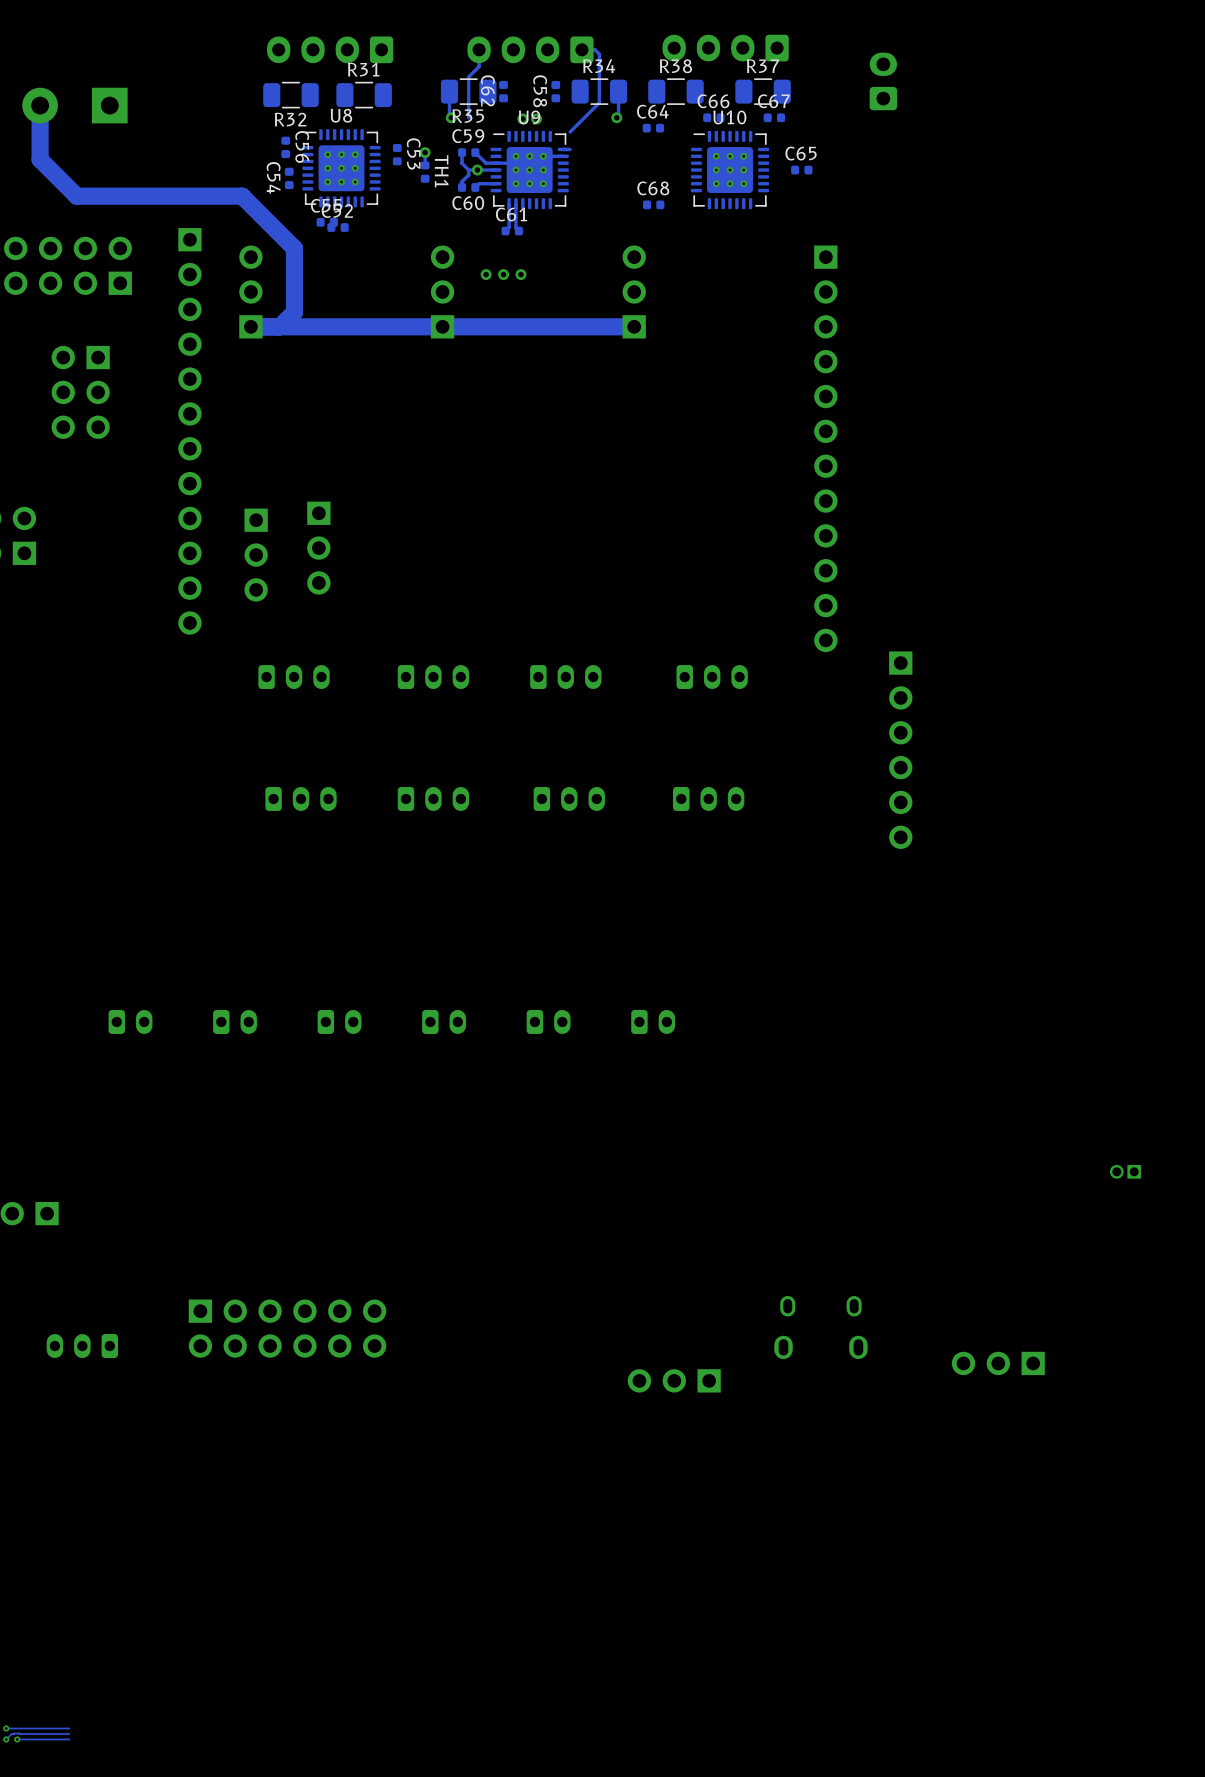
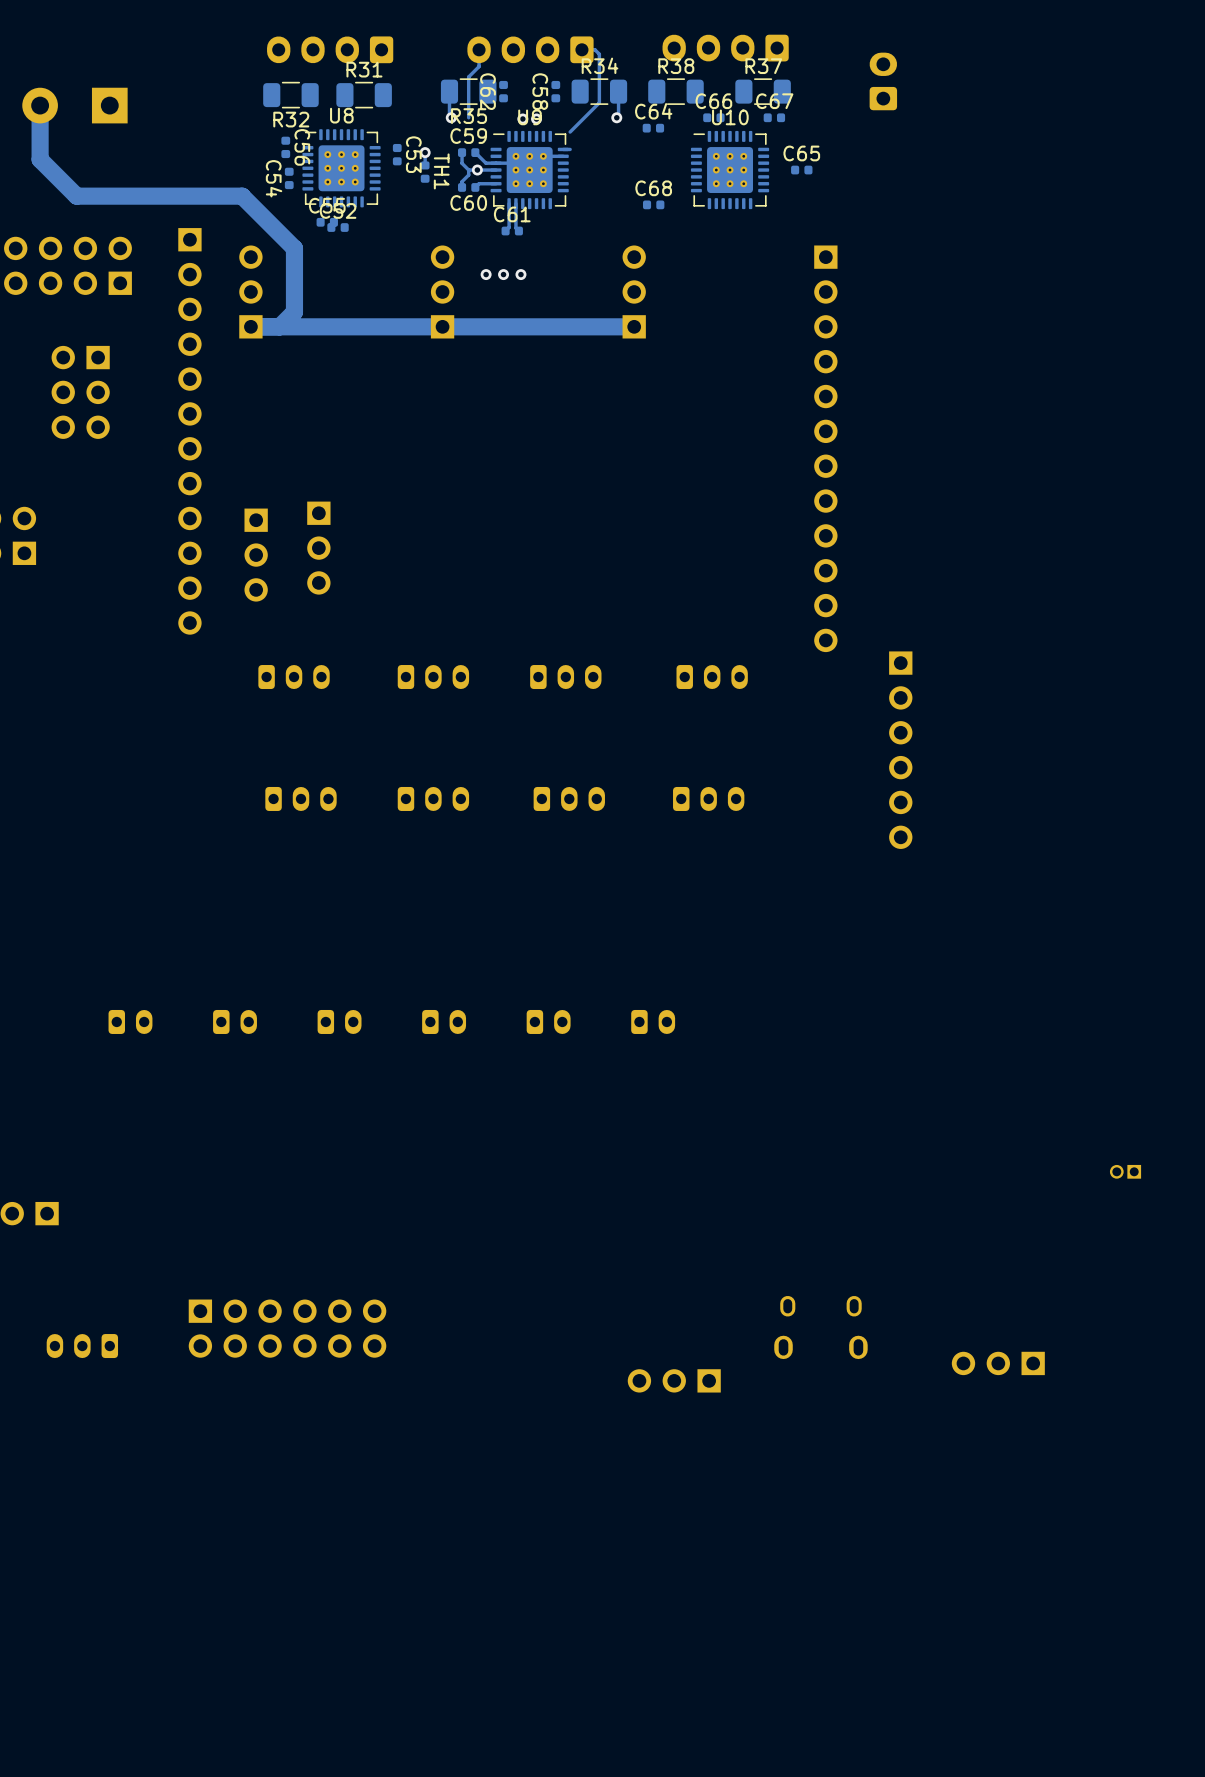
via: (6, 1728) -> none
track: (69, 1728) (6, 1728) -> none
track: (69, 1733) (14, 1733) (6, 1739) -> none
via: (6, 1739) -> none
via: (17, 1739) -> none
track: (69, 1739) (17, 1739) -> none

